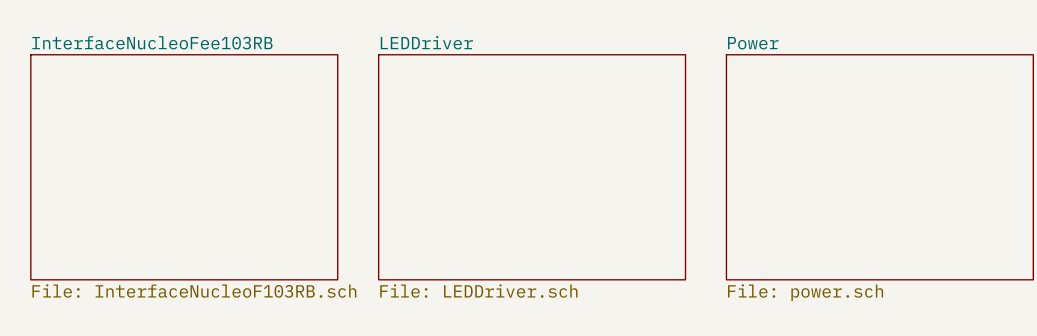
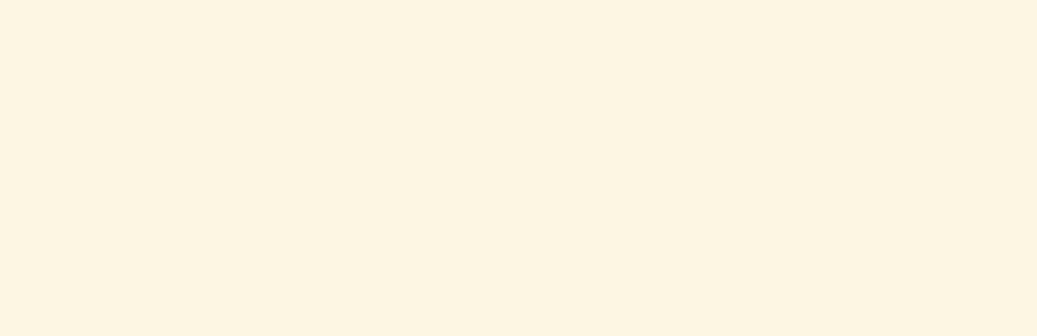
sheet InterfaceNucleoFee103RB: File: InterfaceNucleoF103RB.sch (184, 167) -> none
sheet LEDDriver: File: LEDDriver.sch (532, 167) -> none
sheet Power: File: power.sch (879, 167) -> none

